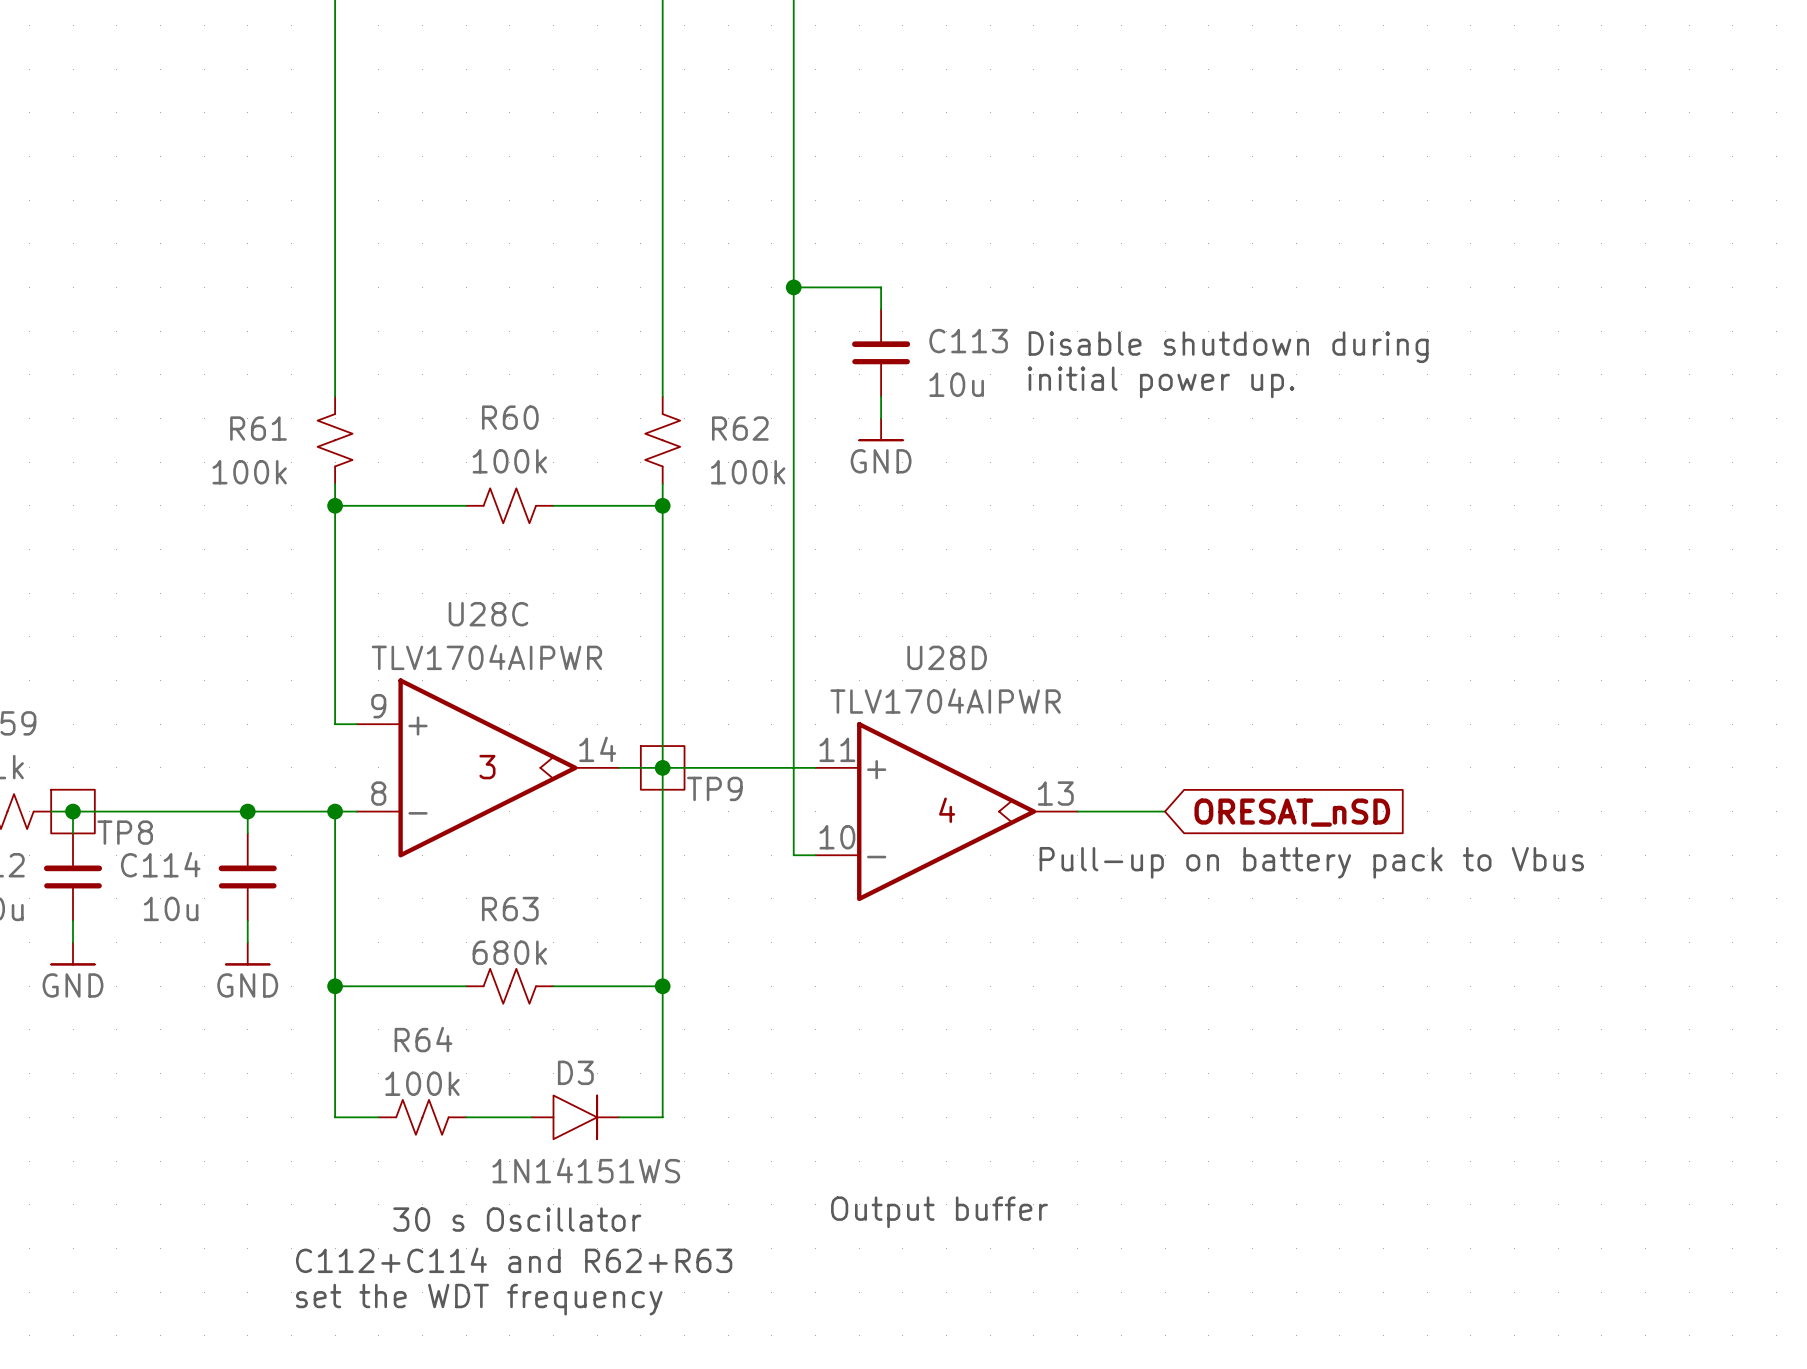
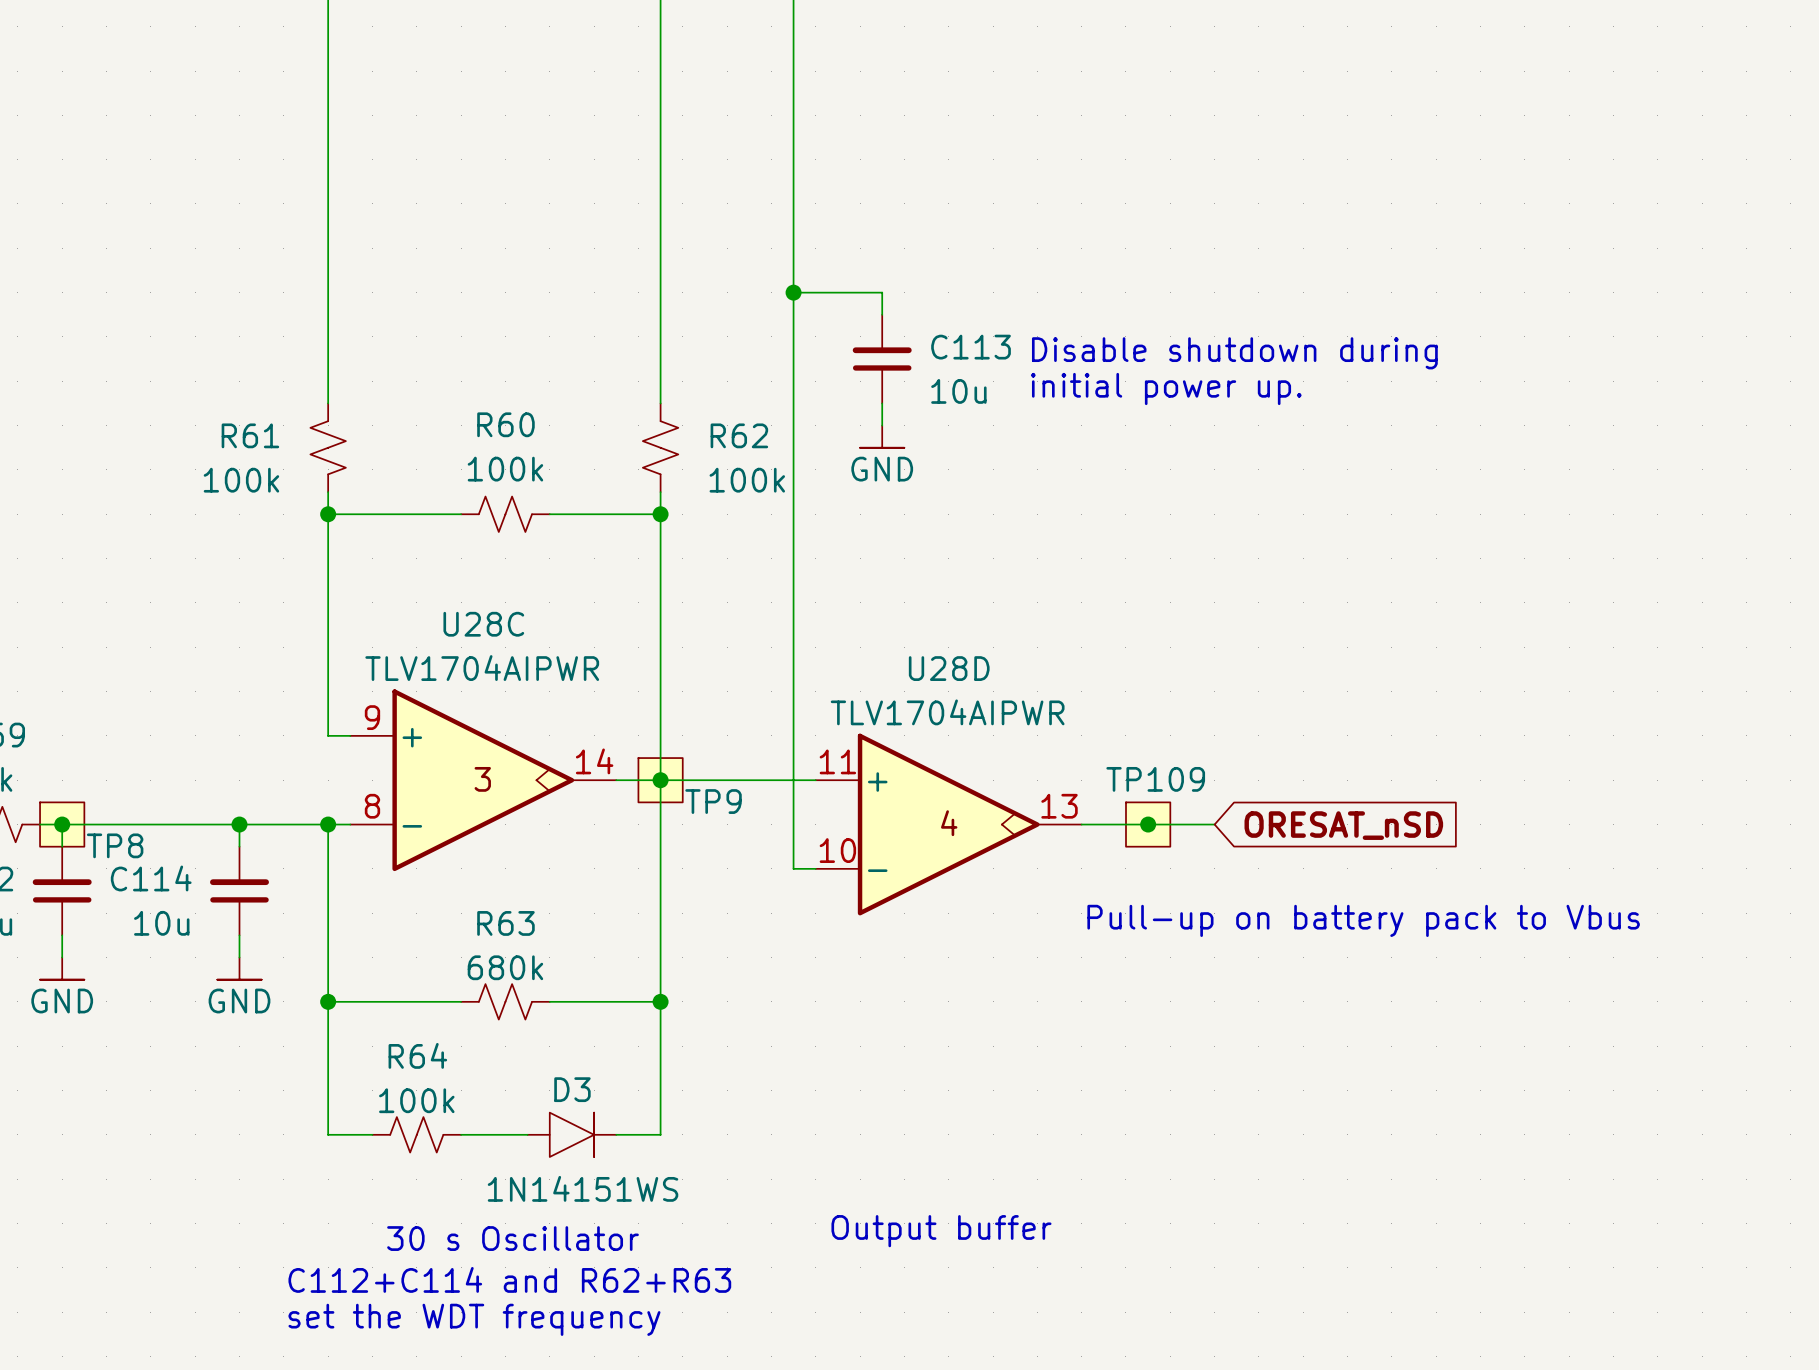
junction: none -> (1148, 824)
TP109: none -> (1148, 824)
wire: none -> (1170, 824) (1214, 824)
global label position: ORESAT_nSD (1292, 812) -> ORESAT_nSD (1343, 825)
text position: Pull-up on battery pack to Vbus (1311, 862) -> Pull-up on battery pack to Vbus (1363, 920)

